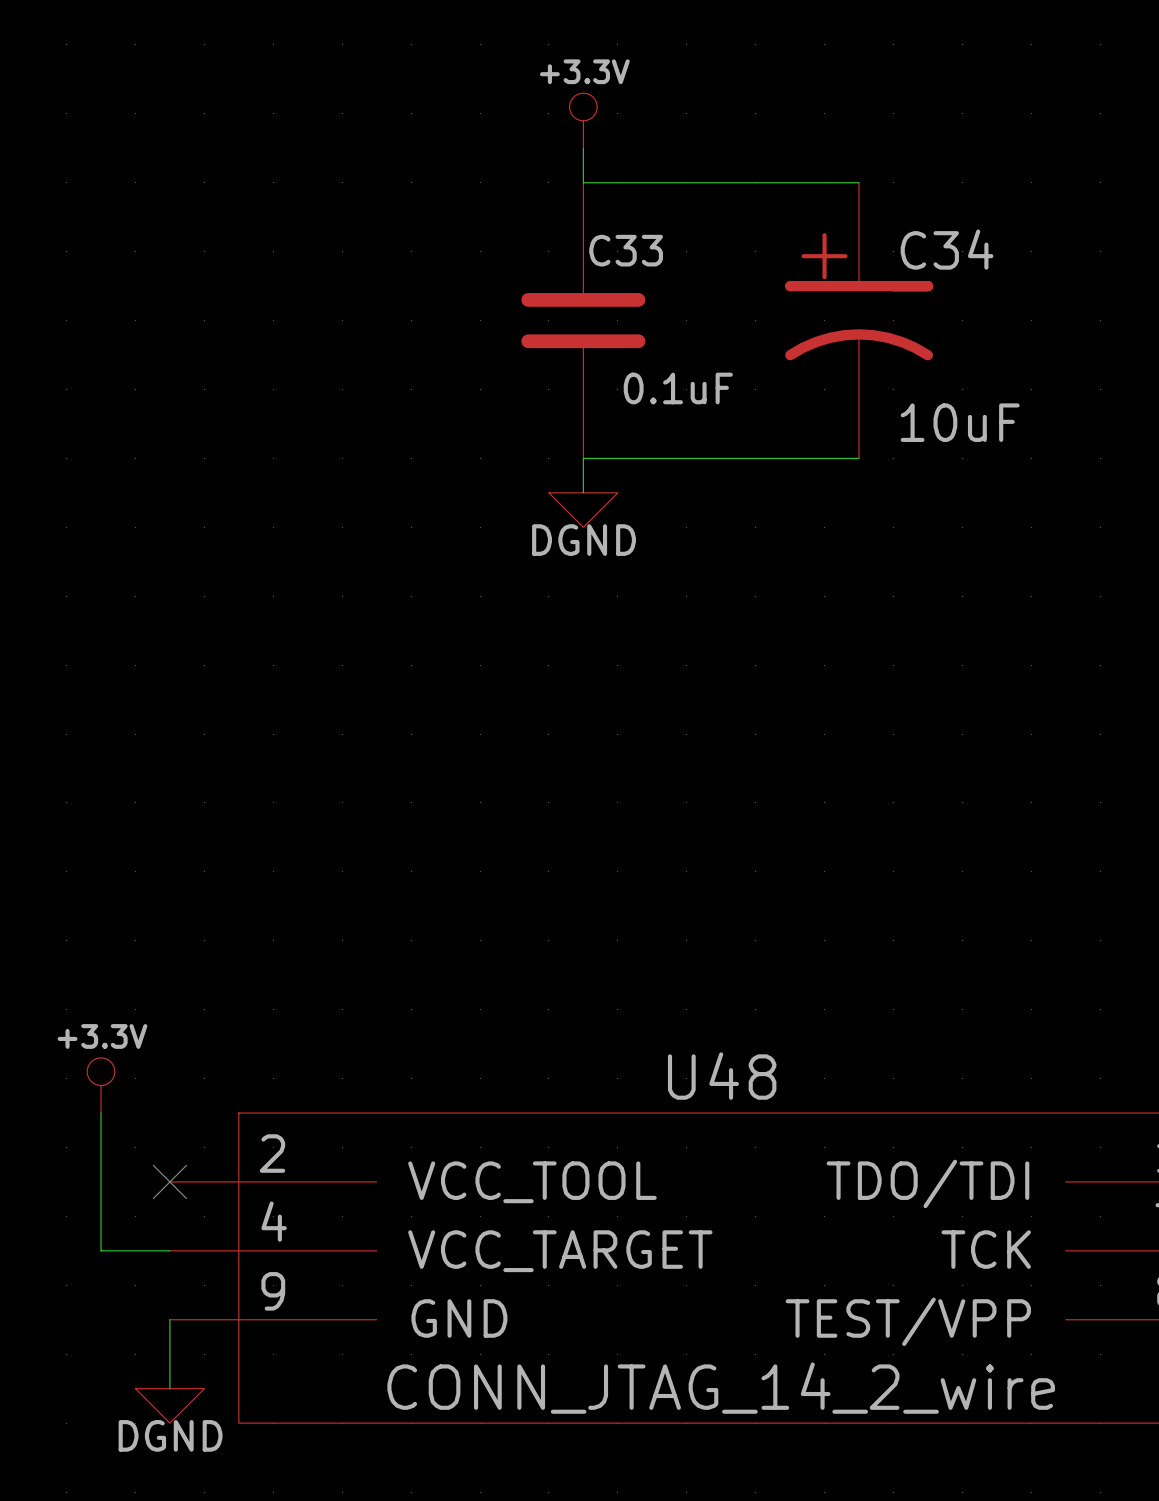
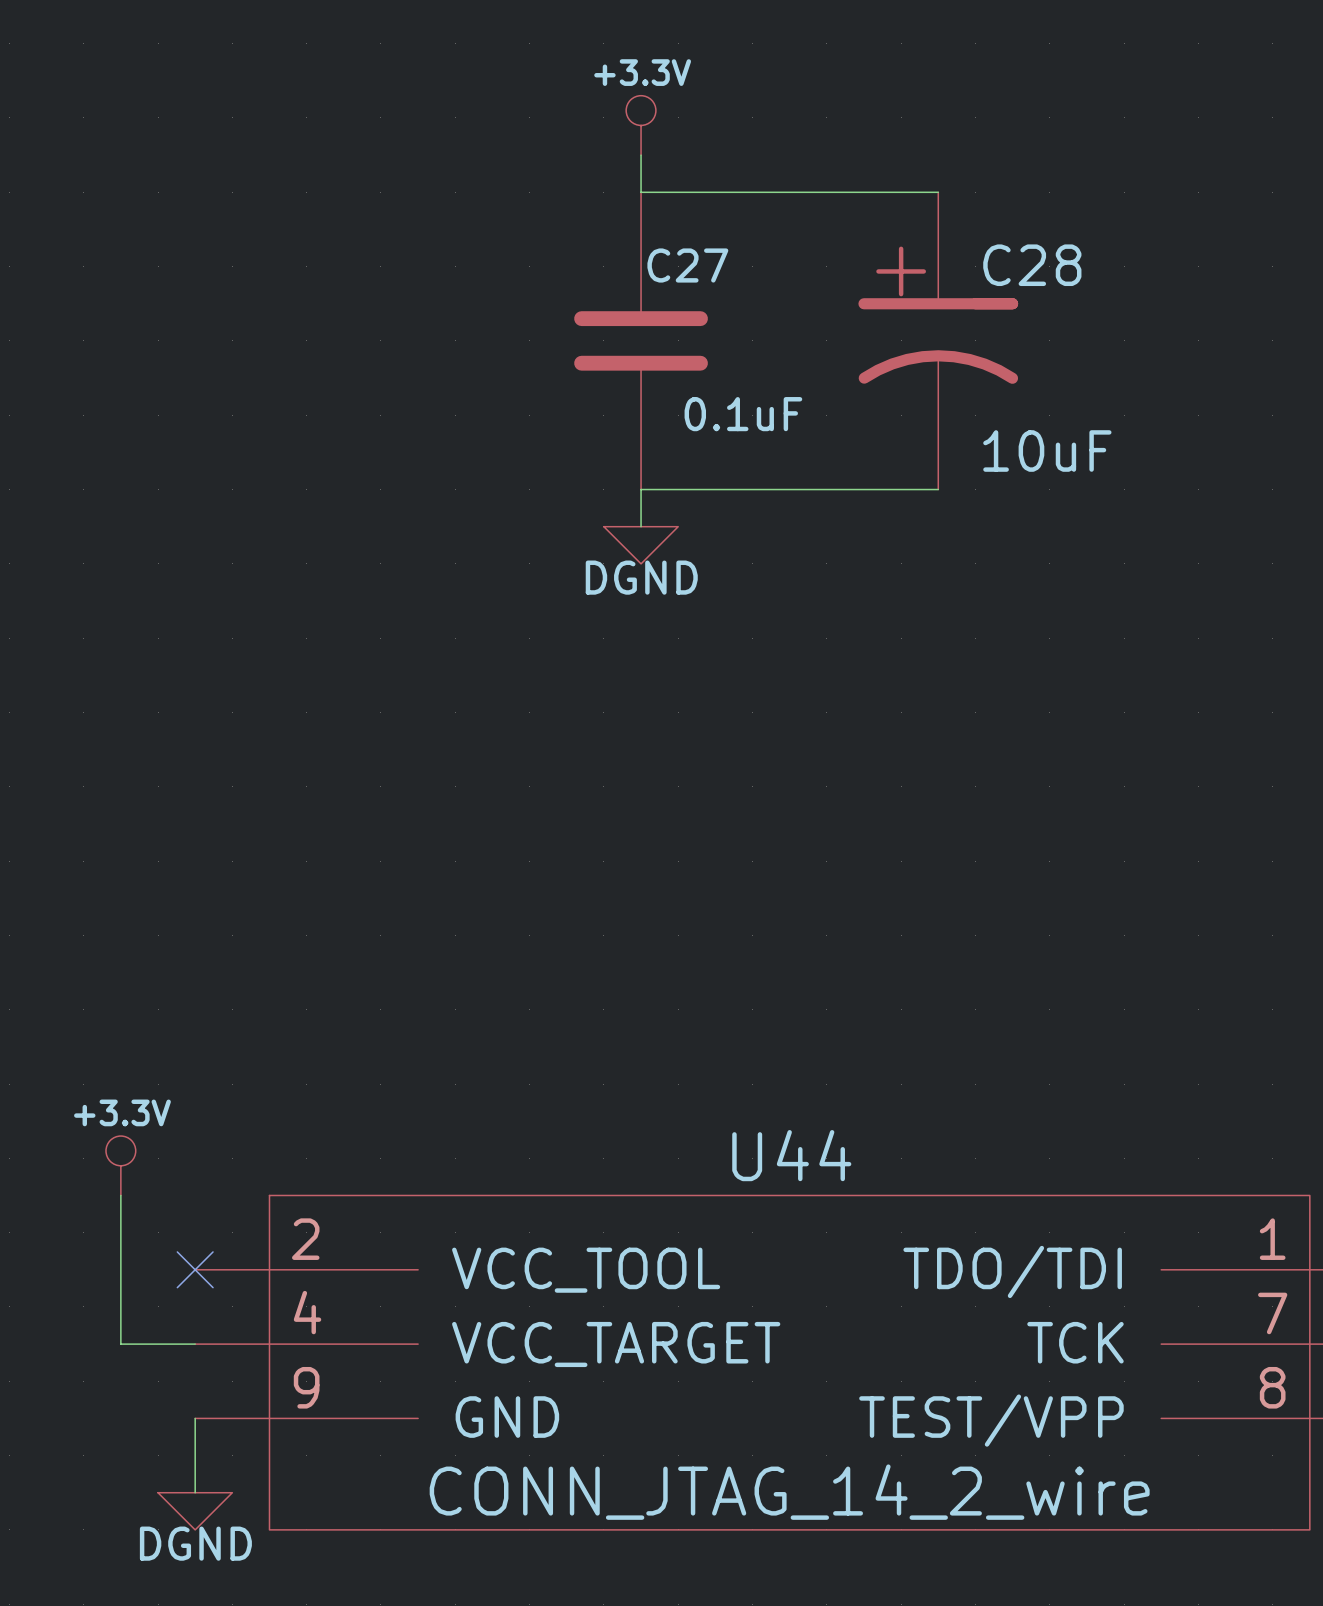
C34 name: C34 (947, 249) -> C28 (1032, 265)
C33 name: C33 (626, 250) -> C27 (687, 265)
U48 name: U48 (722, 1076) -> U44 (791, 1155)

